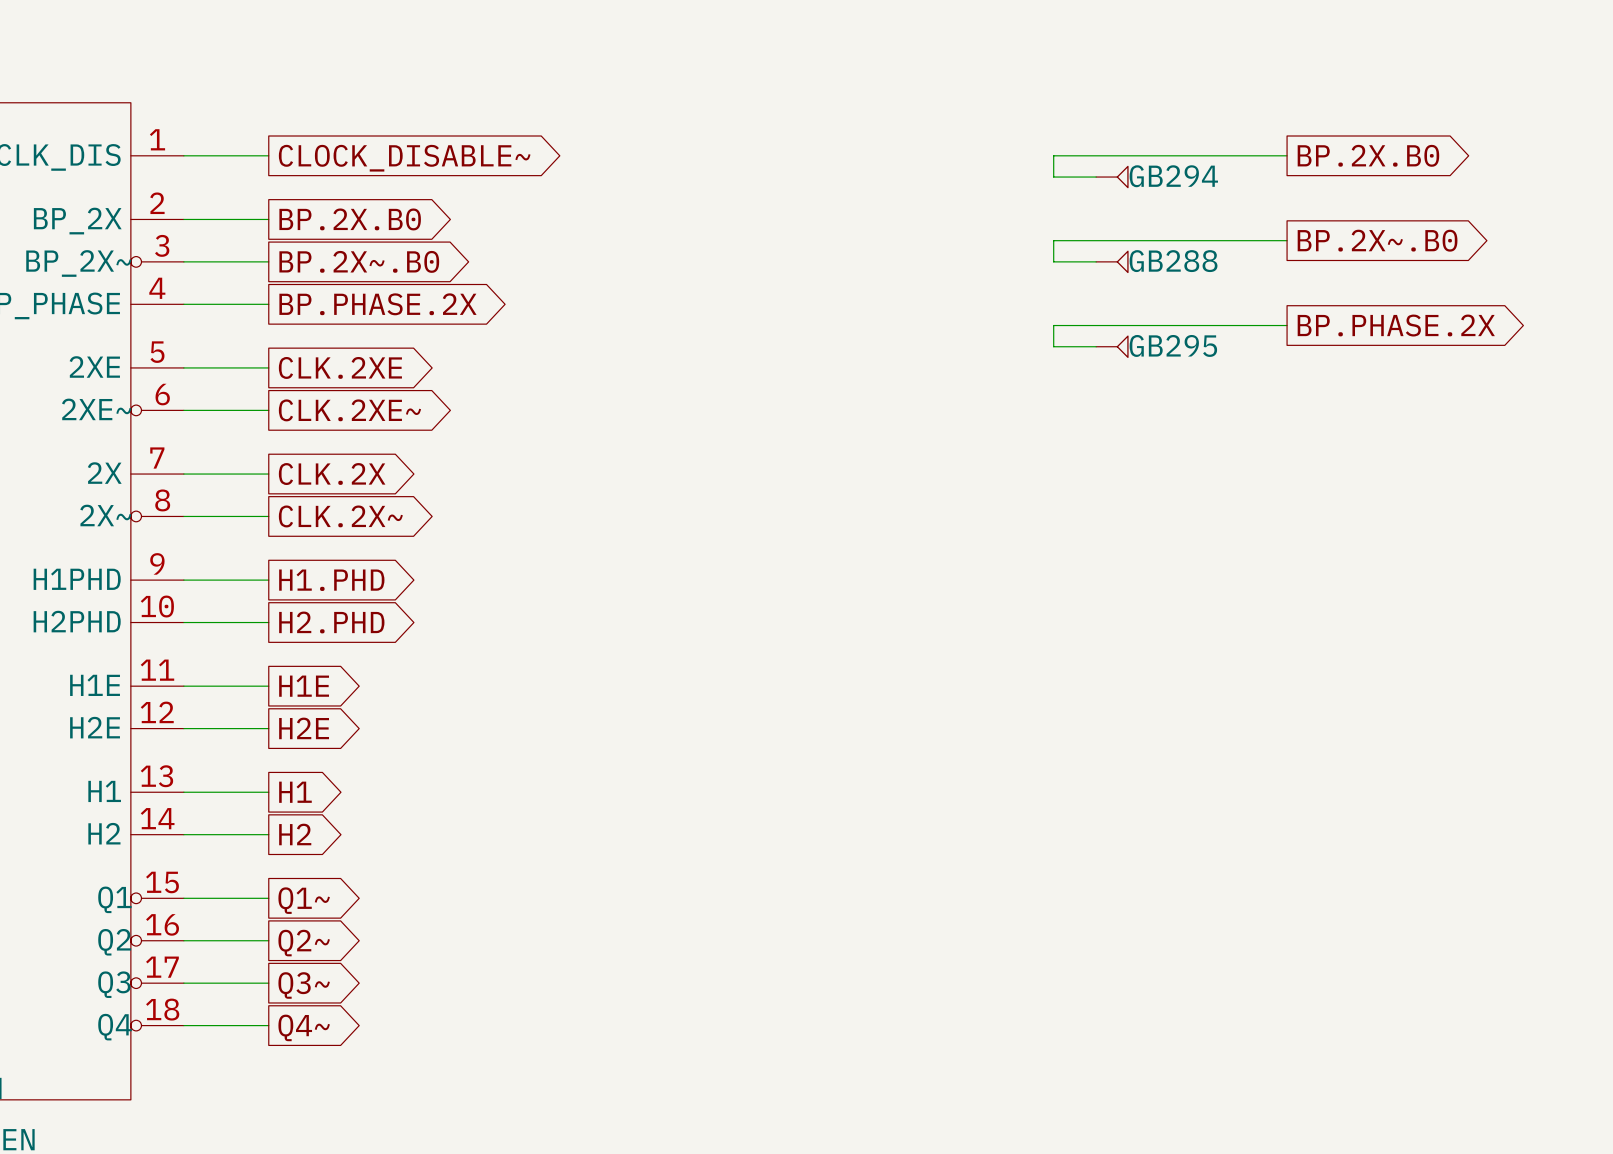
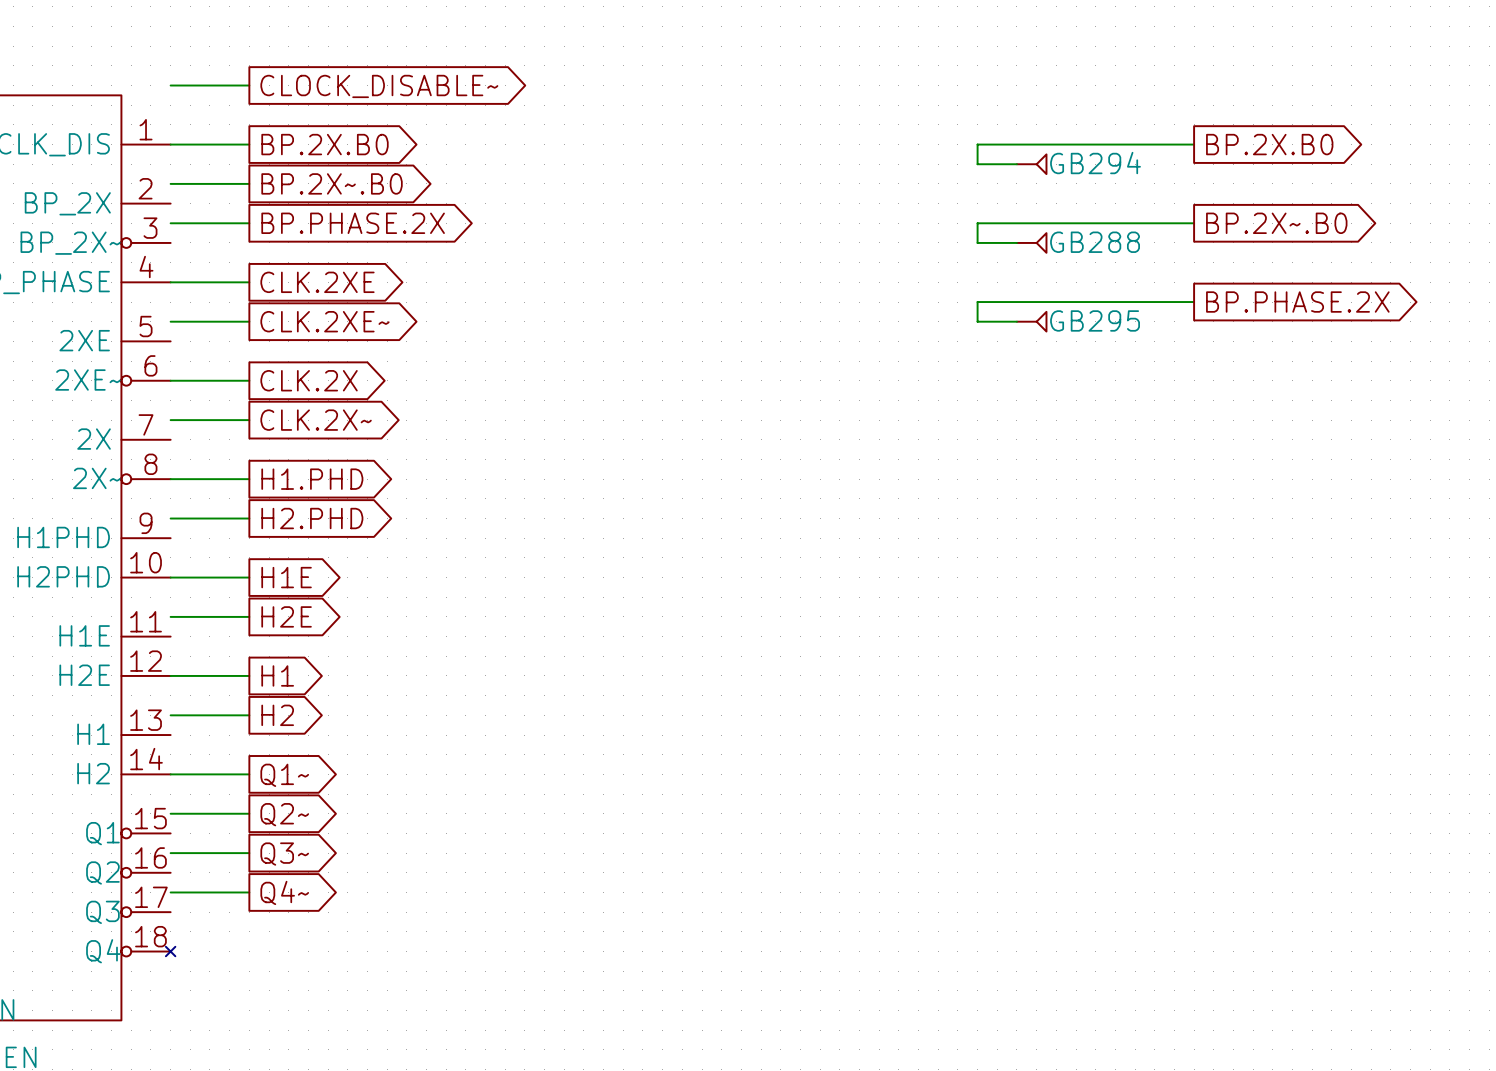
wire: none -> (170, 85) (249, 85)
global label: none -> CLOCK_DISABLE~ (379, 86)
global label: CLOCK_DISABLE~ (404, 158) -> BP.2X.B0 (324, 144)
wire: (183, 219) (268, 219) -> (170, 183) (249, 183)
global label: BP.2X.B0 (350, 219) -> none
global label: none -> BP.PHASE.2X (353, 223)
wire: (183, 261) (268, 261) -> (170, 223) (249, 223)
global label position: BP.2X~.B0 (359, 261) -> BP.2X~.B0 (332, 183)
global label: BP.PHASE.2X (377, 304) -> CLK.2XE (317, 282)
wire: (183, 367) (268, 367) -> (170, 321) (249, 321)
global label: CLK.2XE (340, 367) -> CLK.2XE~ (324, 321)
global label: CLK.2XE~ (349, 410) -> CLK.2X (309, 380)
wire: (183, 474) (268, 474) -> (170, 420) (249, 420)
global label: CLK.2X (332, 474) -> CLK.2X~ (316, 420)
global label: CLK.2X~ (340, 516) -> H1.PHD (312, 479)
wire: (183, 580) (268, 580) -> (170, 518) (249, 518)
global label: H1.PHD (331, 580) -> H2.PHD (312, 518)
global label: H2.PHD (331, 622) -> H1E (286, 577)
wire: (183, 686) (268, 686) -> (170, 616) (249, 616)
global label: H1E (304, 686) -> H2E (286, 616)
global label: H2E (304, 728) -> H1 (277, 675)
global label: none -> H2 (277, 715)
wire: (183, 792) (268, 792) -> (170, 715) (249, 715)
global label: H1 (295, 792) -> none
global label: H2 (295, 834) -> Q1~ (284, 775)
wire: (183, 898) (268, 898) -> (170, 813) (249, 813)
global label: Q1~ (304, 900) -> none
wire: (183, 940) (268, 940) -> (170, 853) (249, 853)
global label position: Q2~ (304, 943) -> Q2~ (284, 814)
wire: (183, 983) (268, 983) -> (170, 892) (249, 892)
global label position: Q3~ (304, 985) -> Q3~ (284, 854)
wire: (183, 1025) (268, 1025) -> none
no-connect mark: none -> (170, 951)
global label position: Q4~ (304, 1027) -> Q4~ (284, 892)

